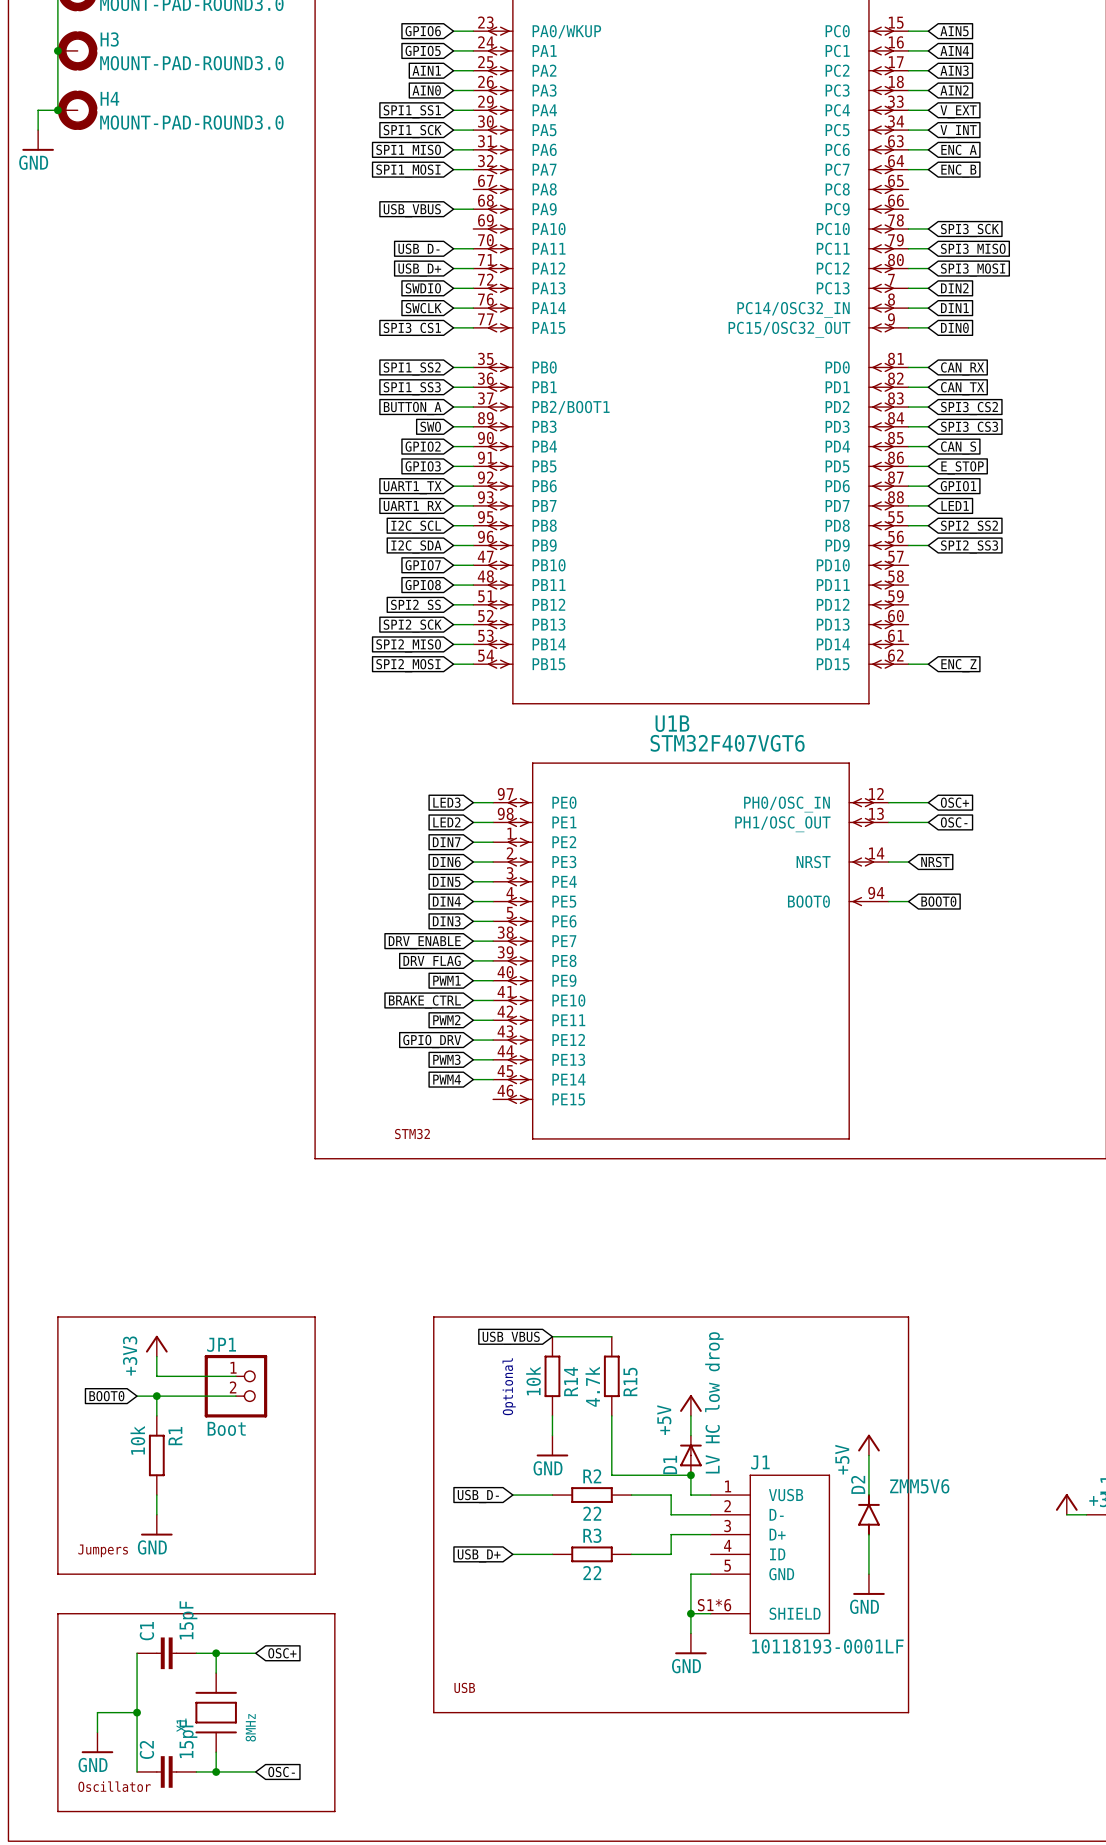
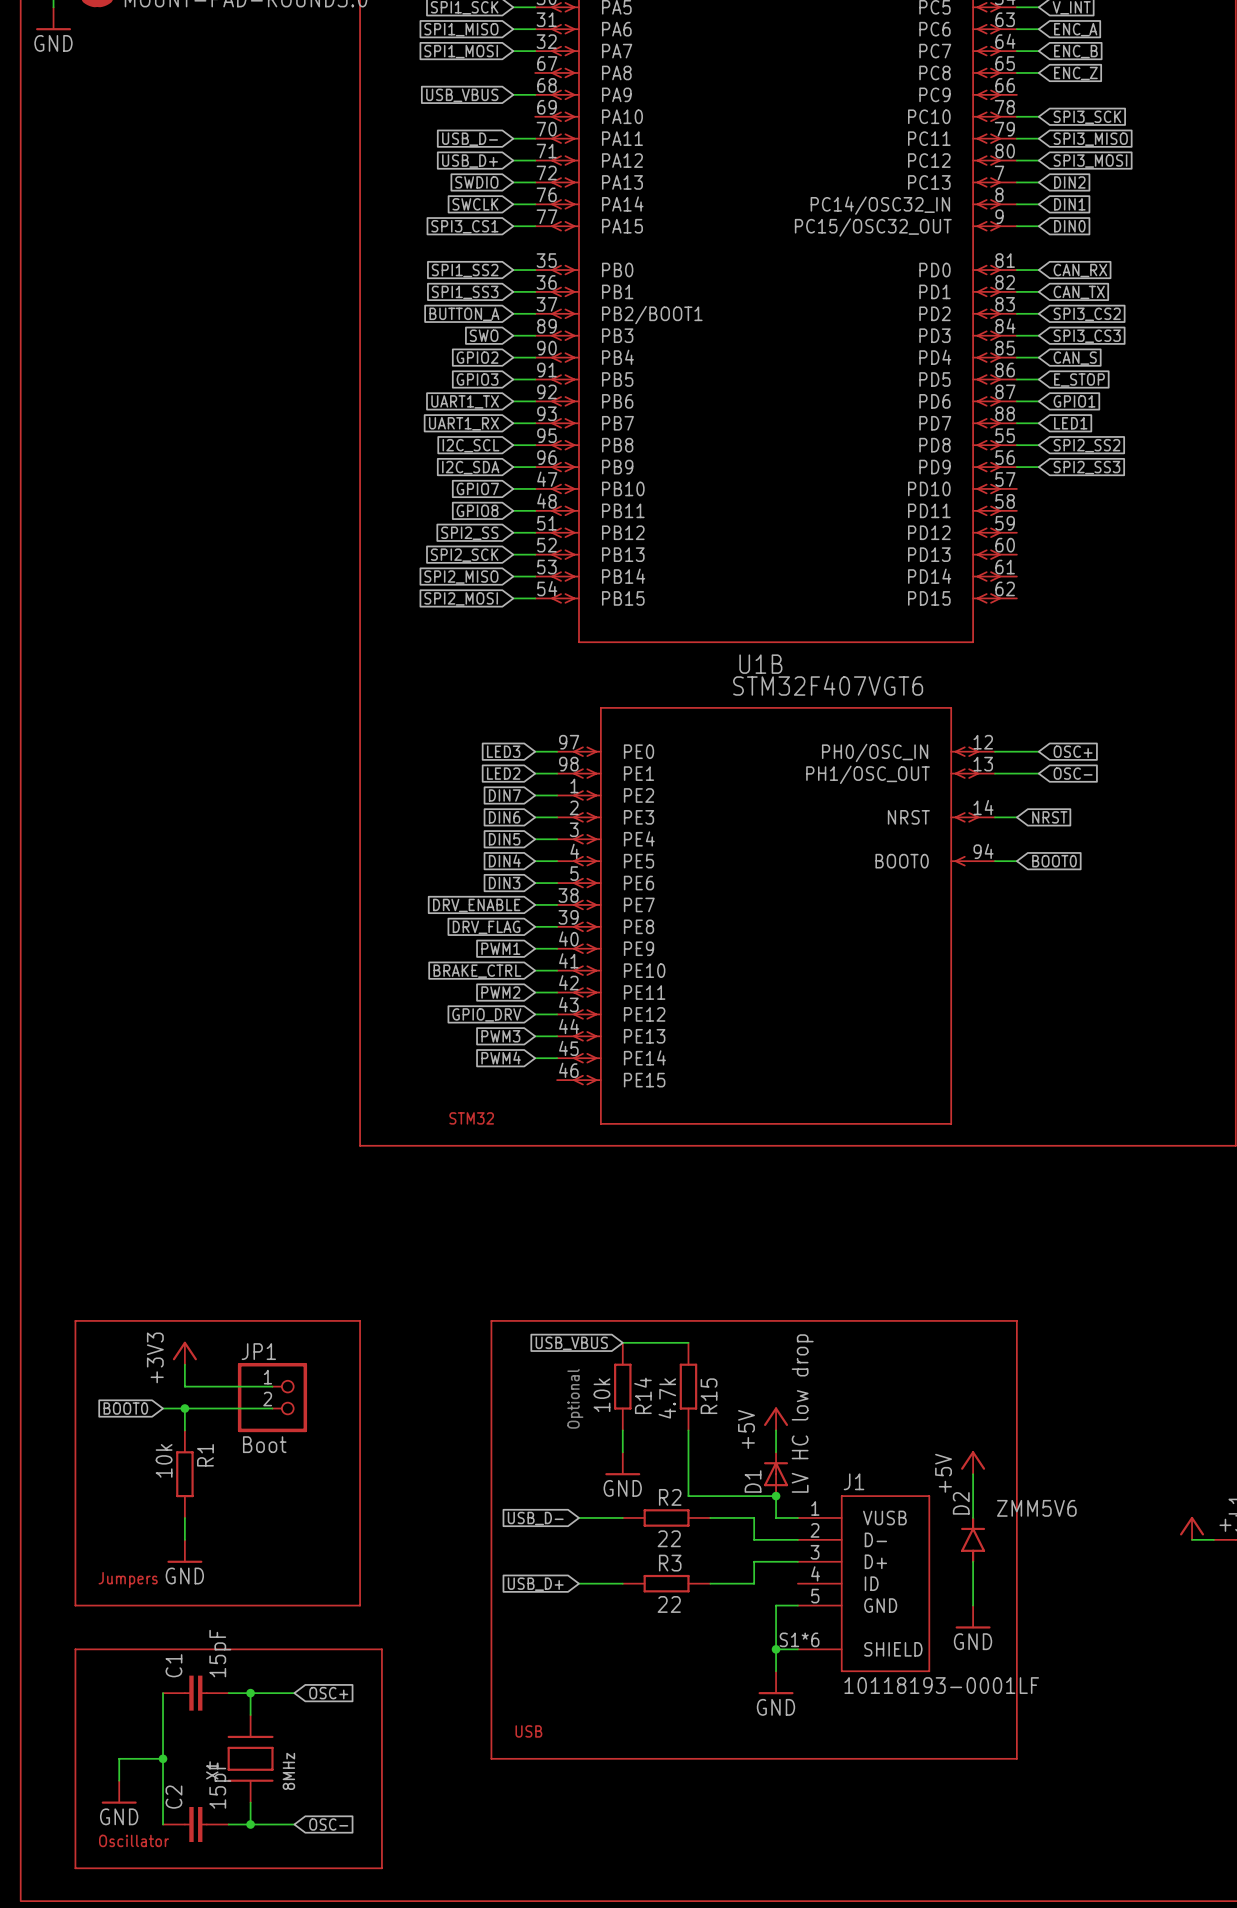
wire: none -> (1016, 72) (1038, 72)
global label: none -> ENC_Z (1075, 73)
wire: (908, 664) (928, 664) -> none
global label: ENC_Z (958, 665) -> none

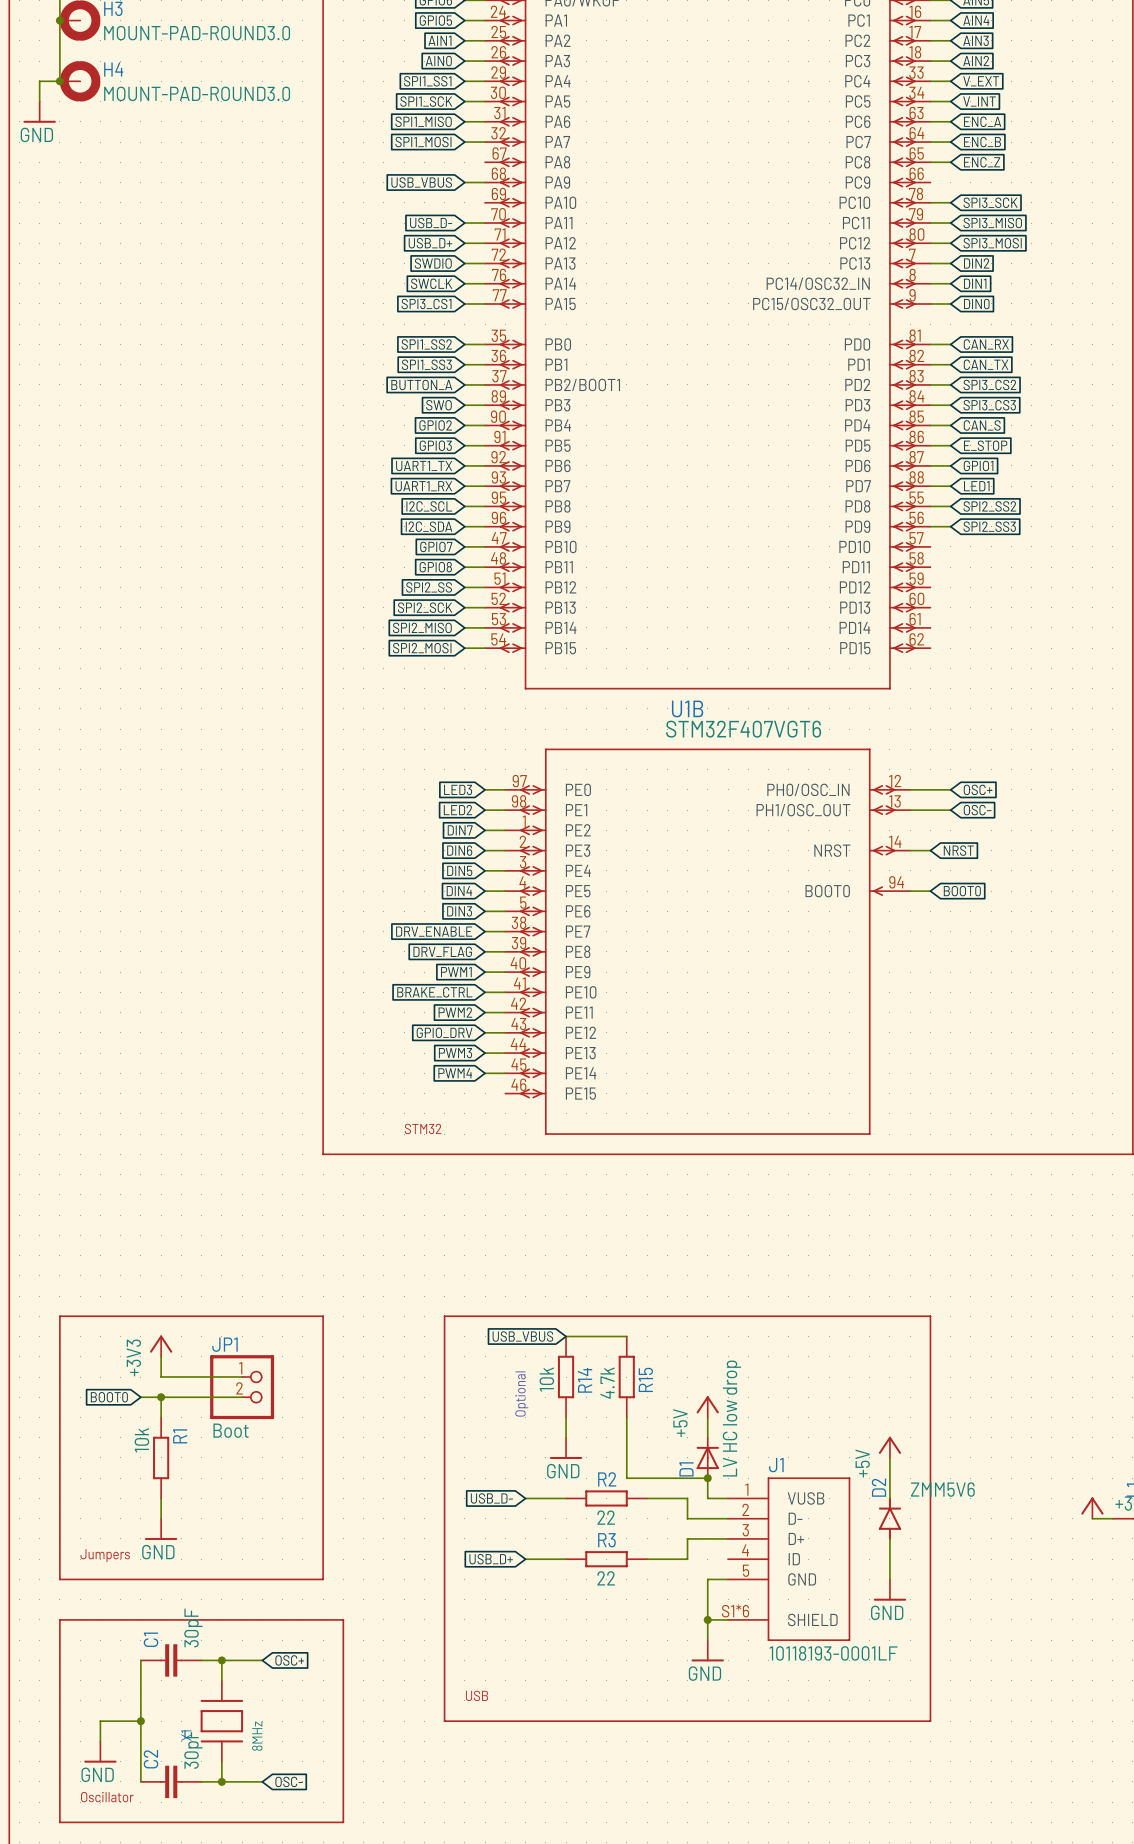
C1 value: 15pF (220, 1653) -> 30pF (193, 1627)
C2 value: 15pF (220, 1784) -> 30pF (193, 1749)

